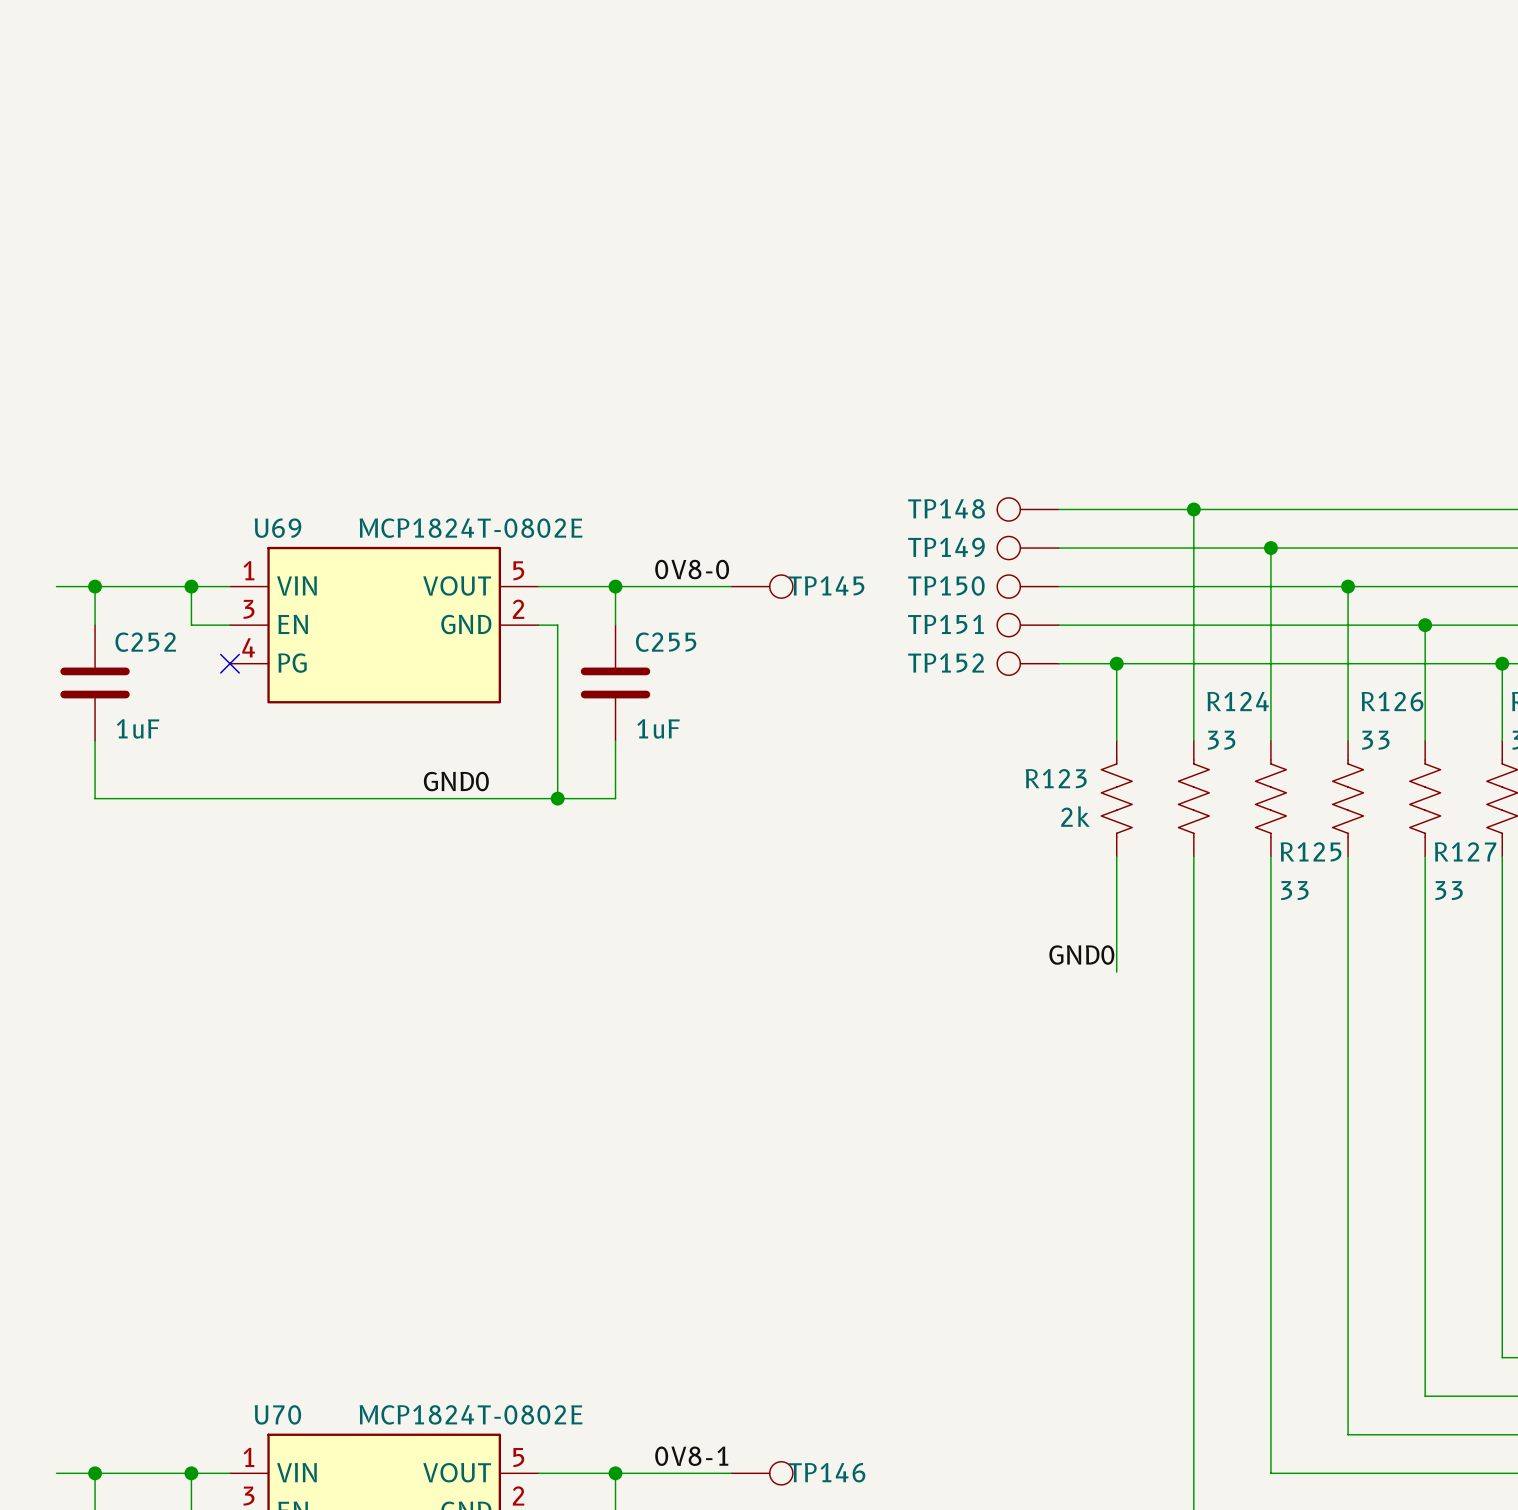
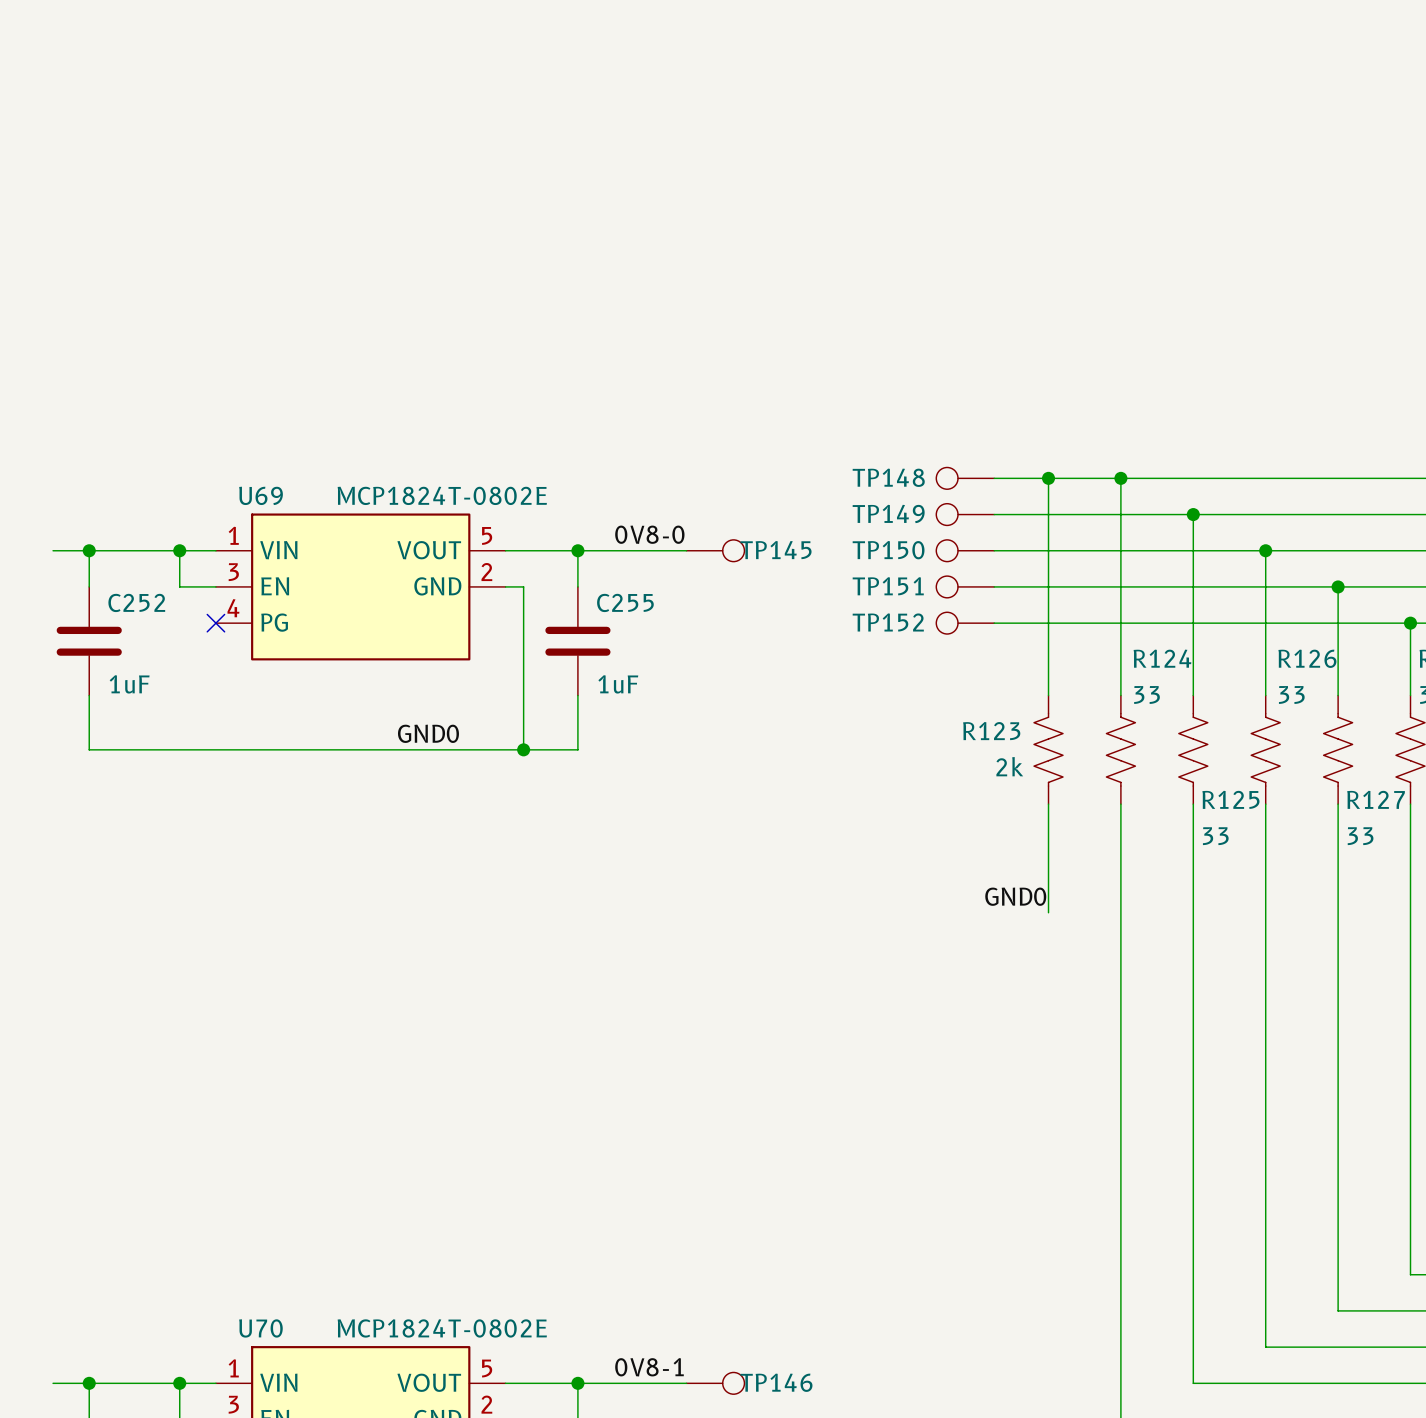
wire: none -> (1048, 478) (1048, 623)
junction: none -> (1048, 478)
junction: (1116, 663) -> none

